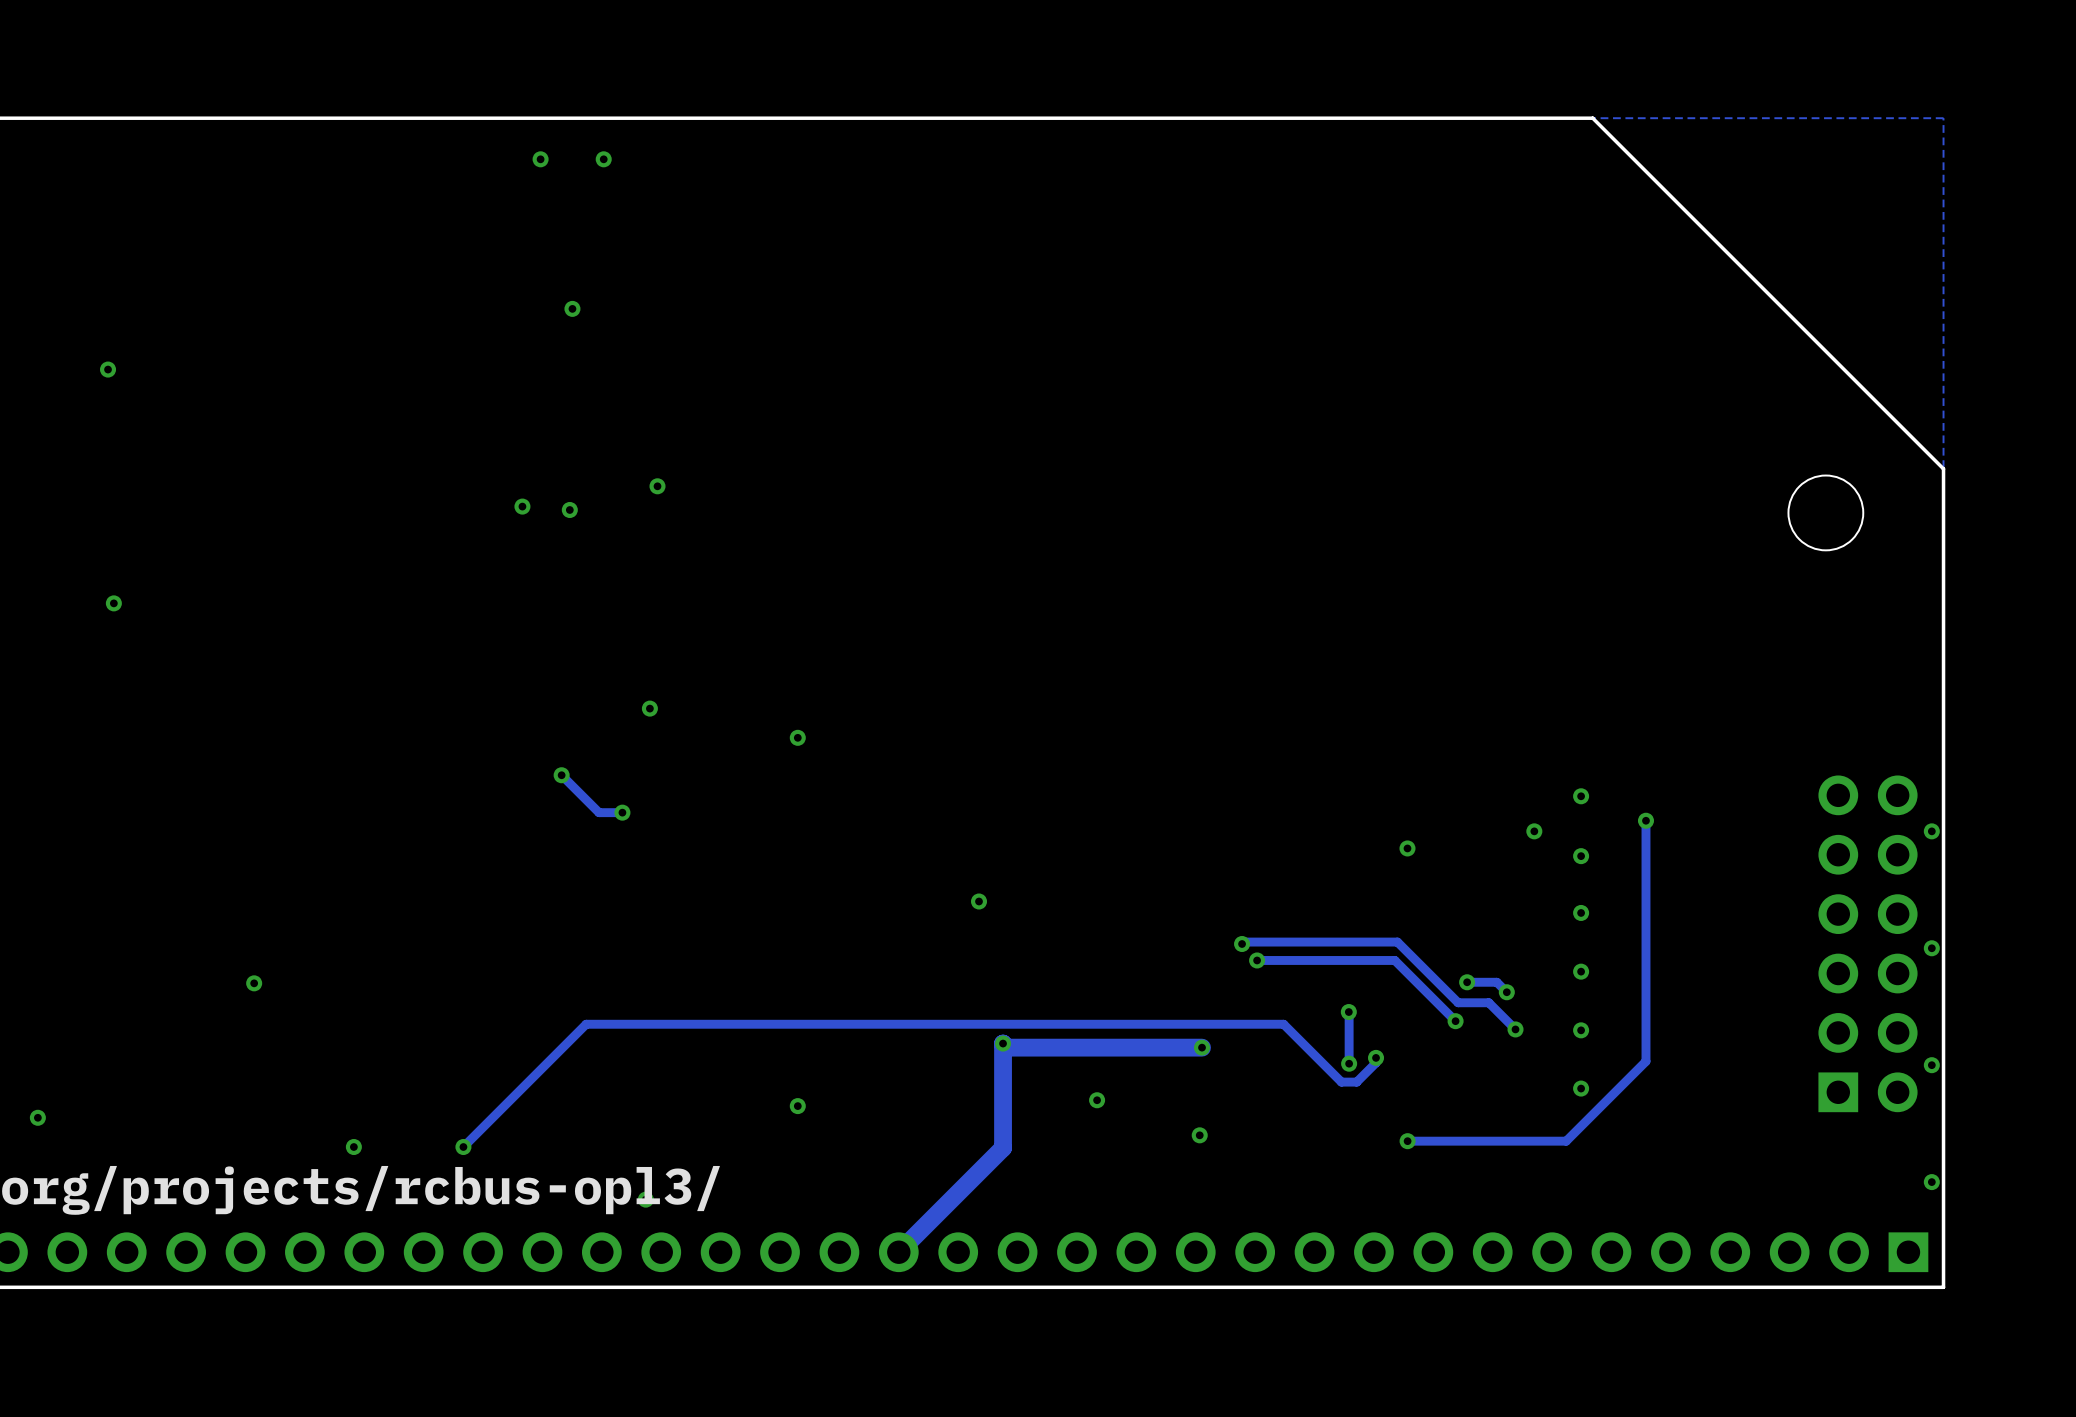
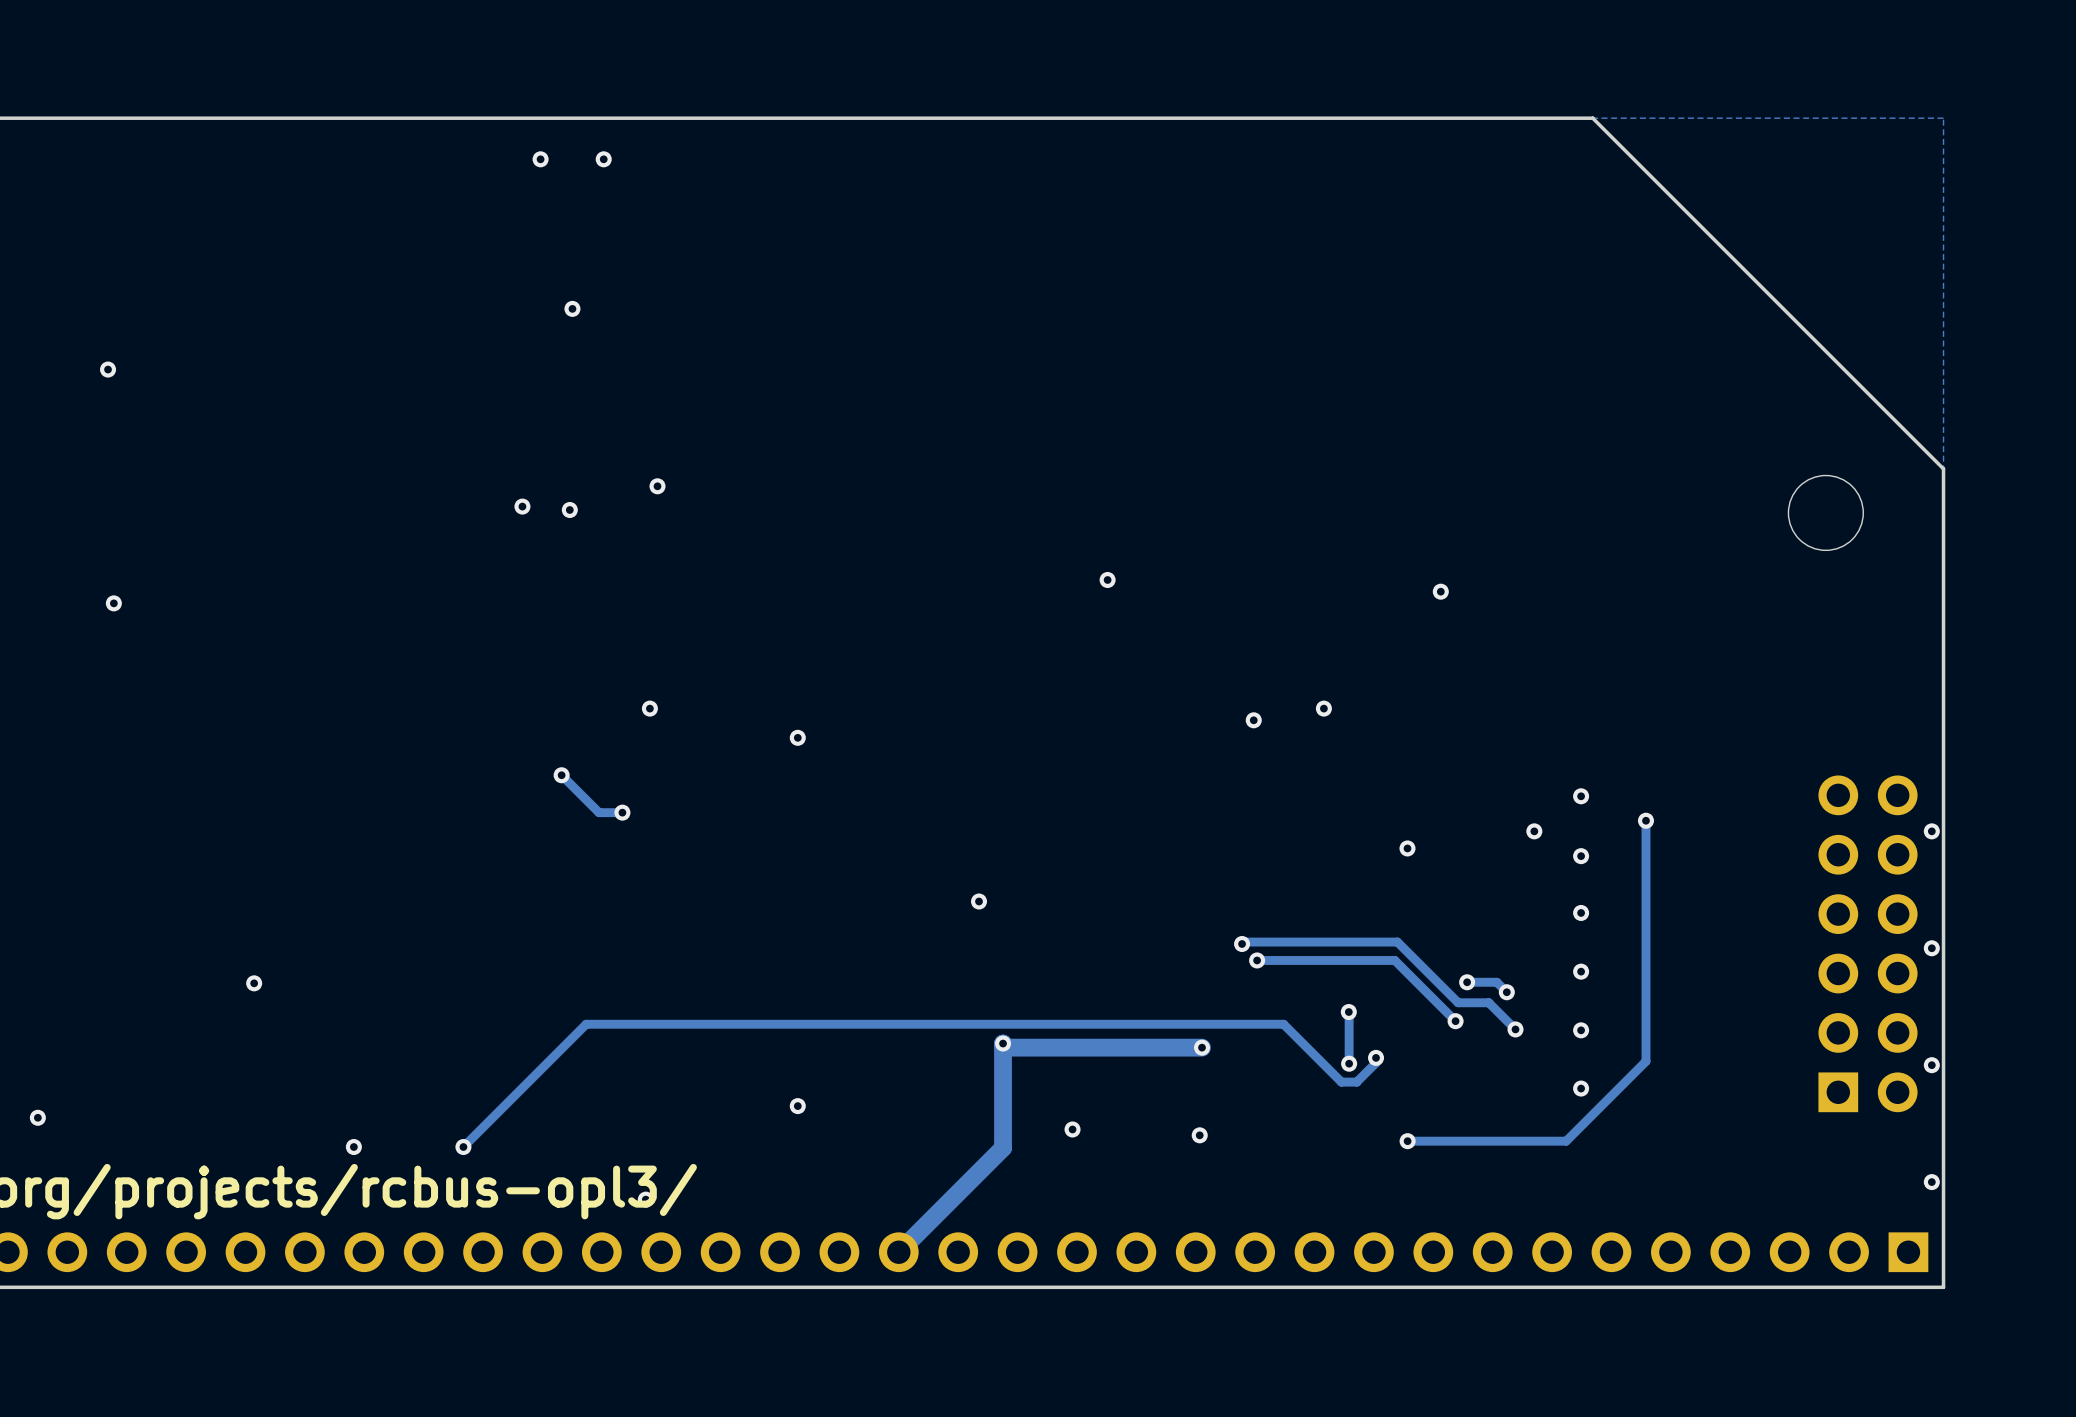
via: none -> (1107, 579)
via: none -> (1440, 591)
via: none -> (1323, 708)
via: none -> (1253, 720)
via position: (1097, 1100) -> (1072, 1129)

